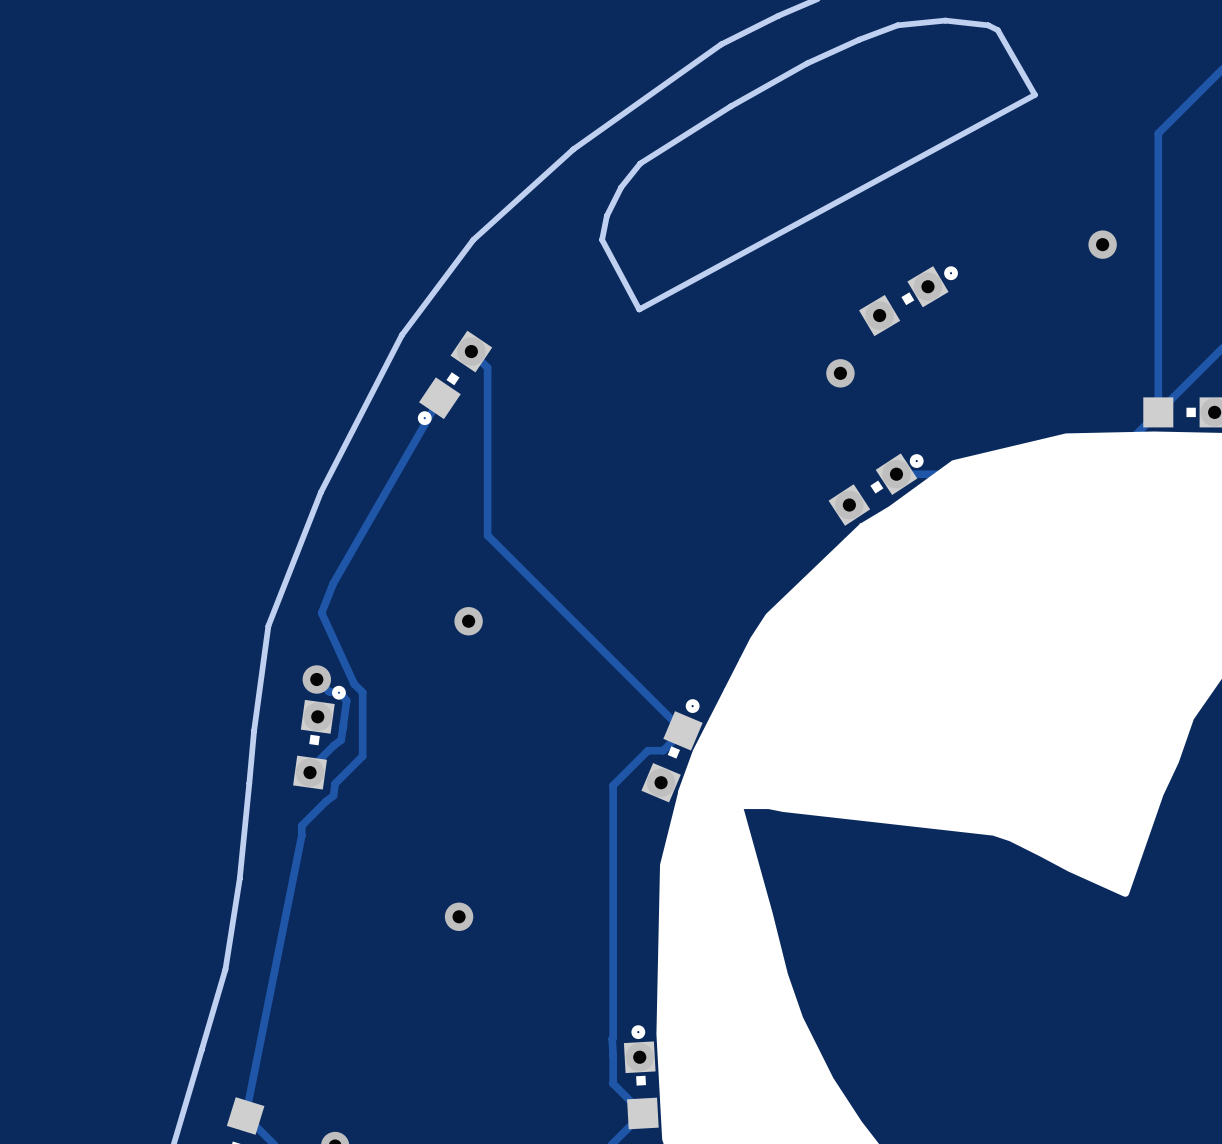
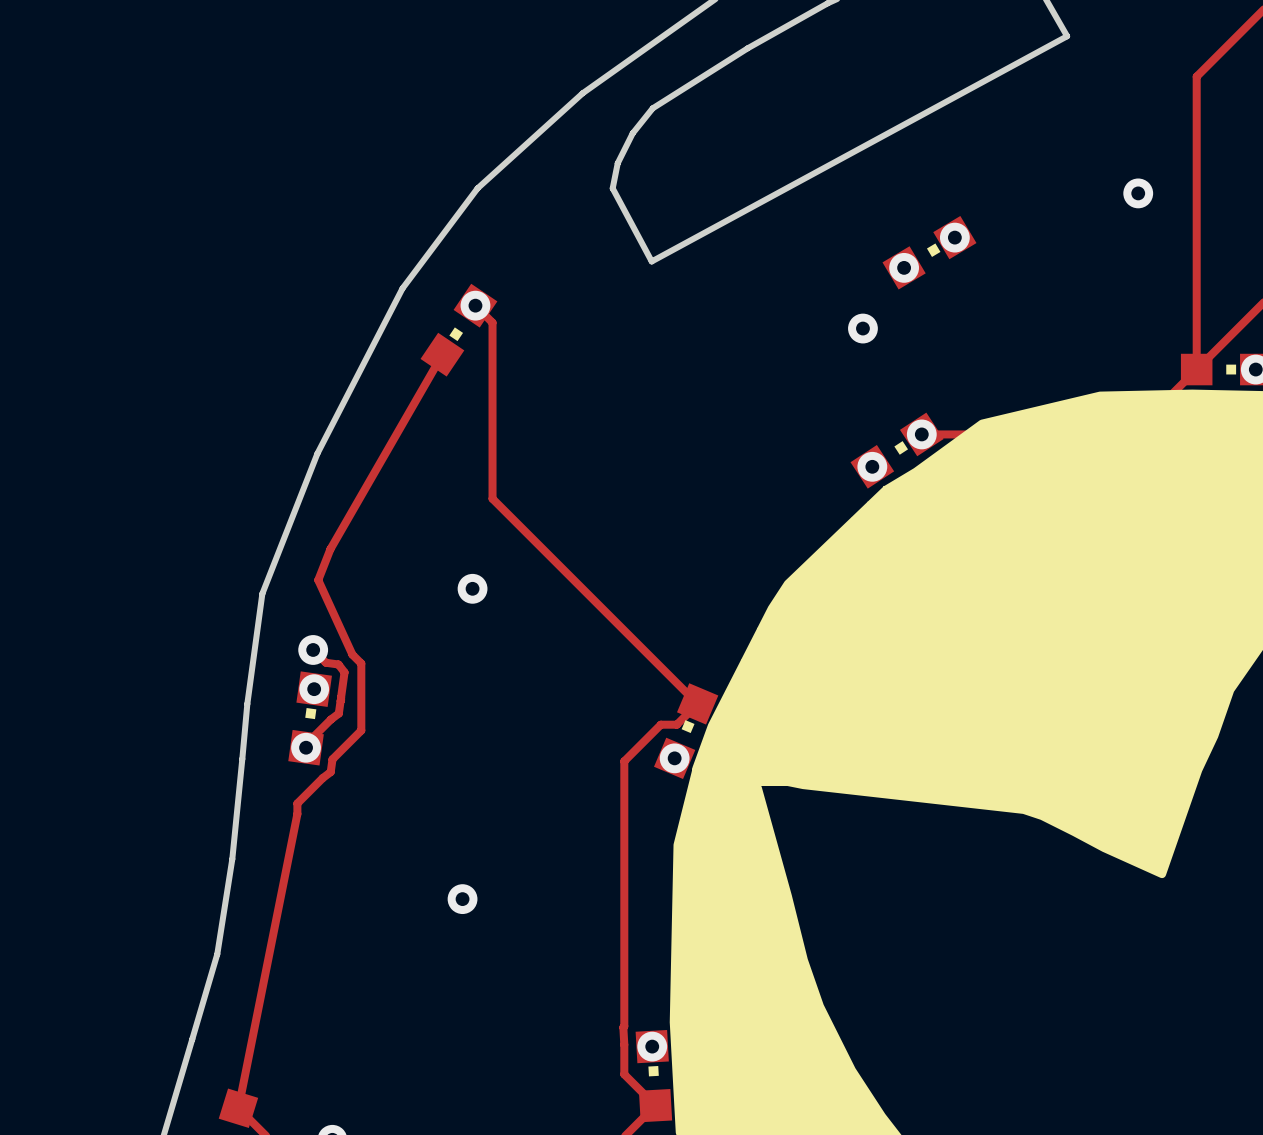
drawing: [944, 266, 958, 281] -> none
drawing: [417, 411, 432, 426] -> none
drawing: [909, 454, 924, 468] -> none
drawing: [332, 685, 346, 700] -> none
drawing: [685, 699, 700, 713] -> none
drawing: [631, 1025, 646, 1040] -> none

